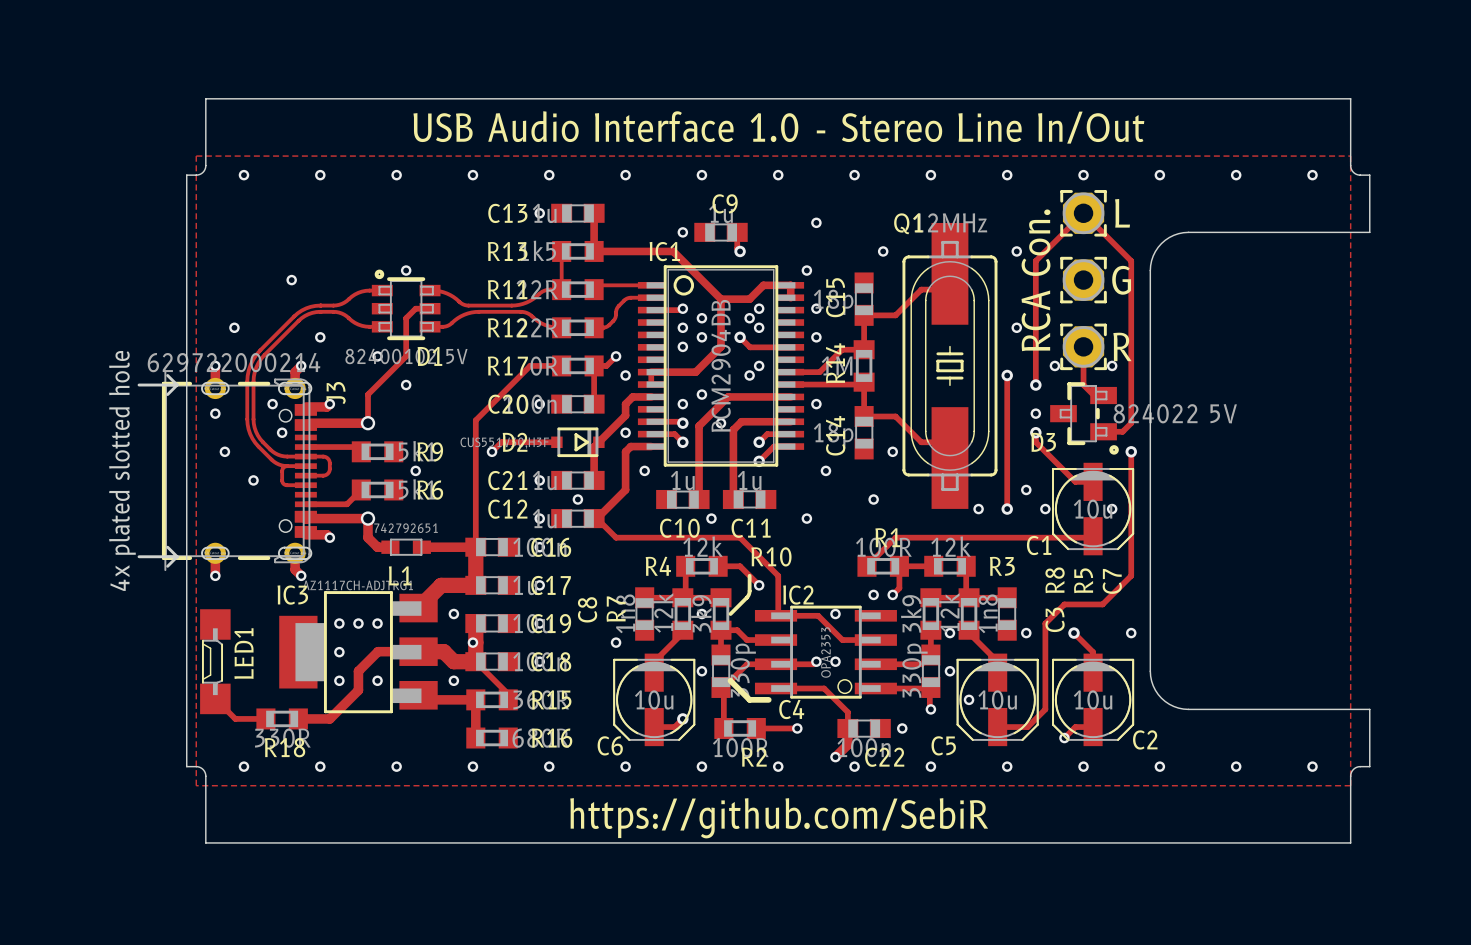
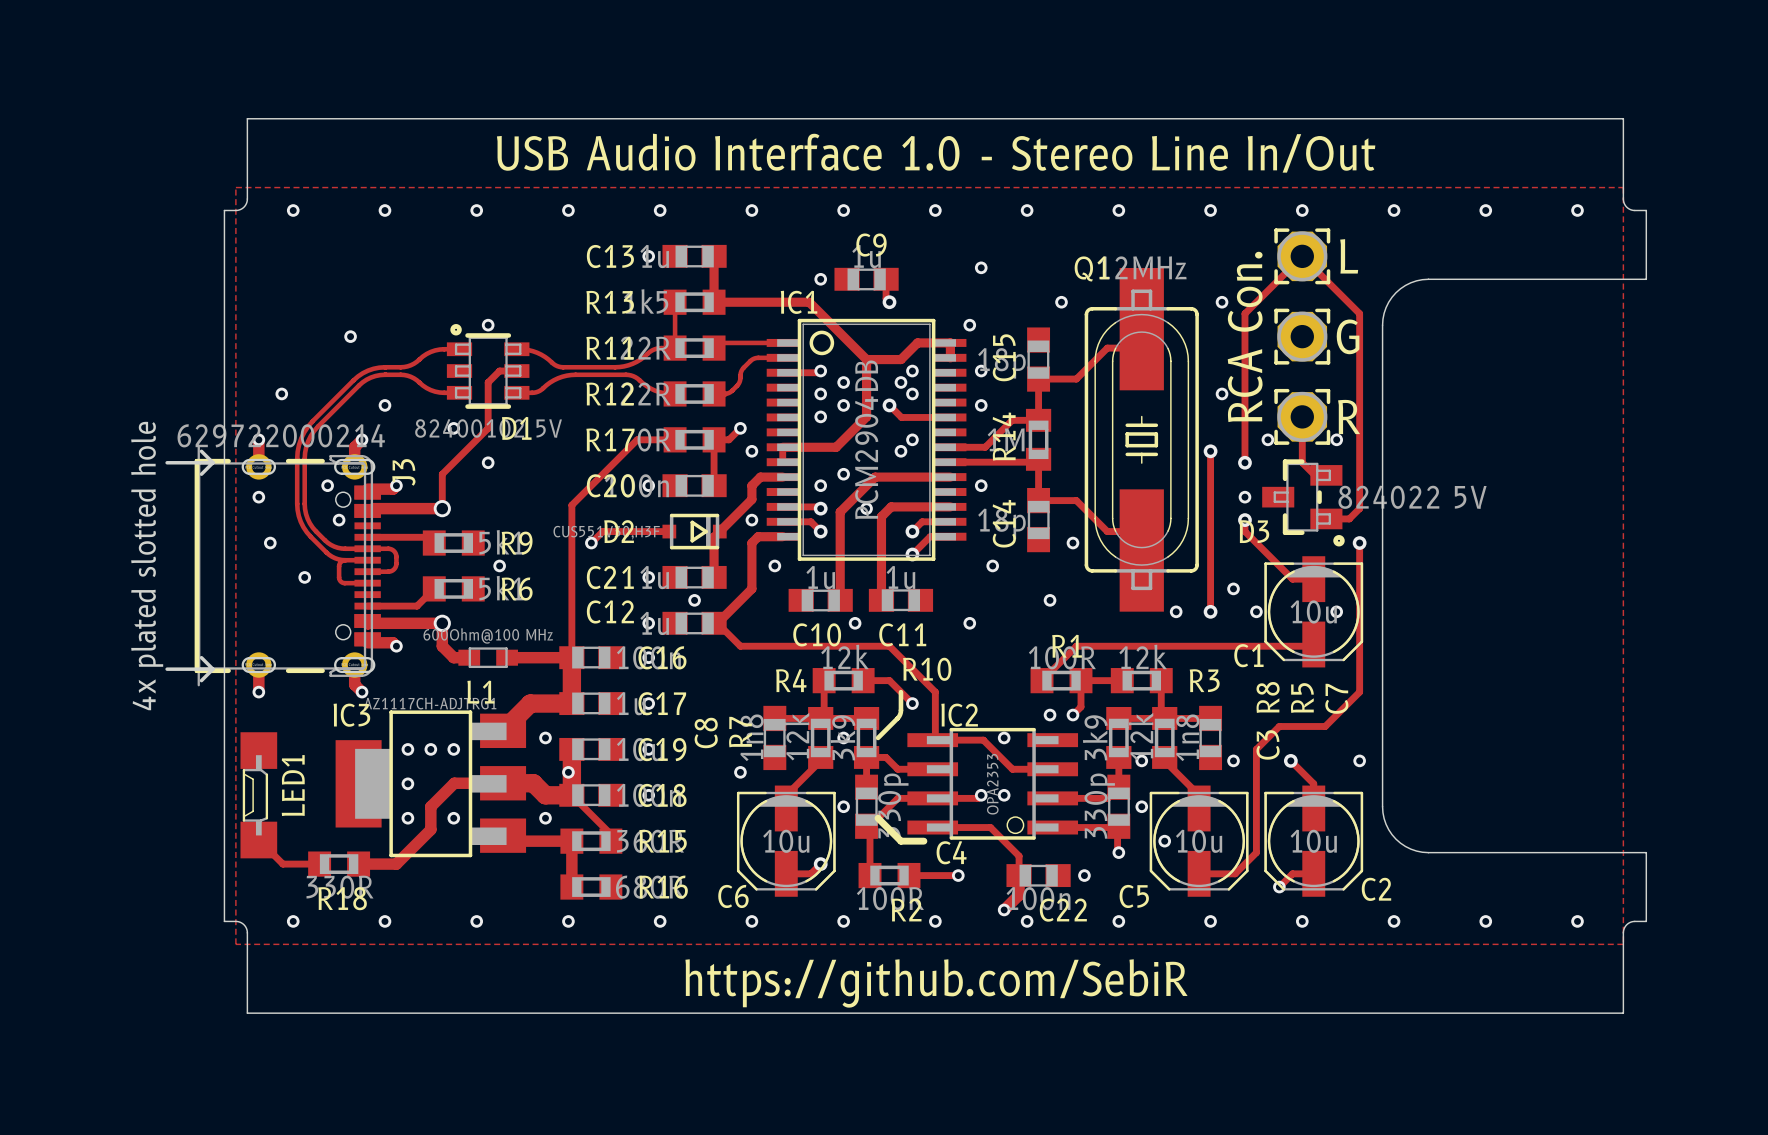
L1 value: 742792651 (406, 528) -> 600Ohm@100 MHz (488, 635)

